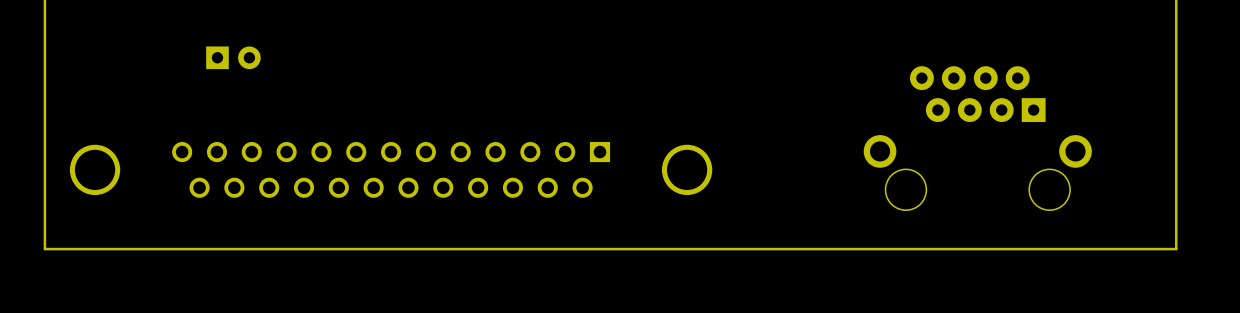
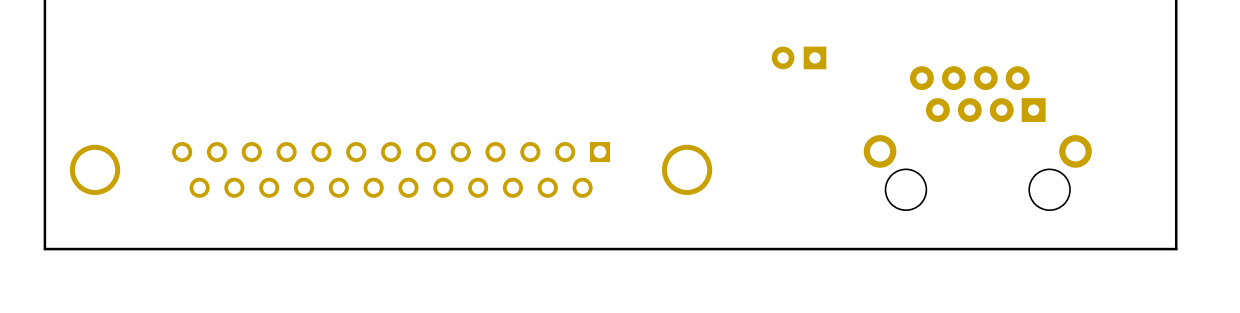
part: (233, 57) -> none
part: none -> (799, 57)

